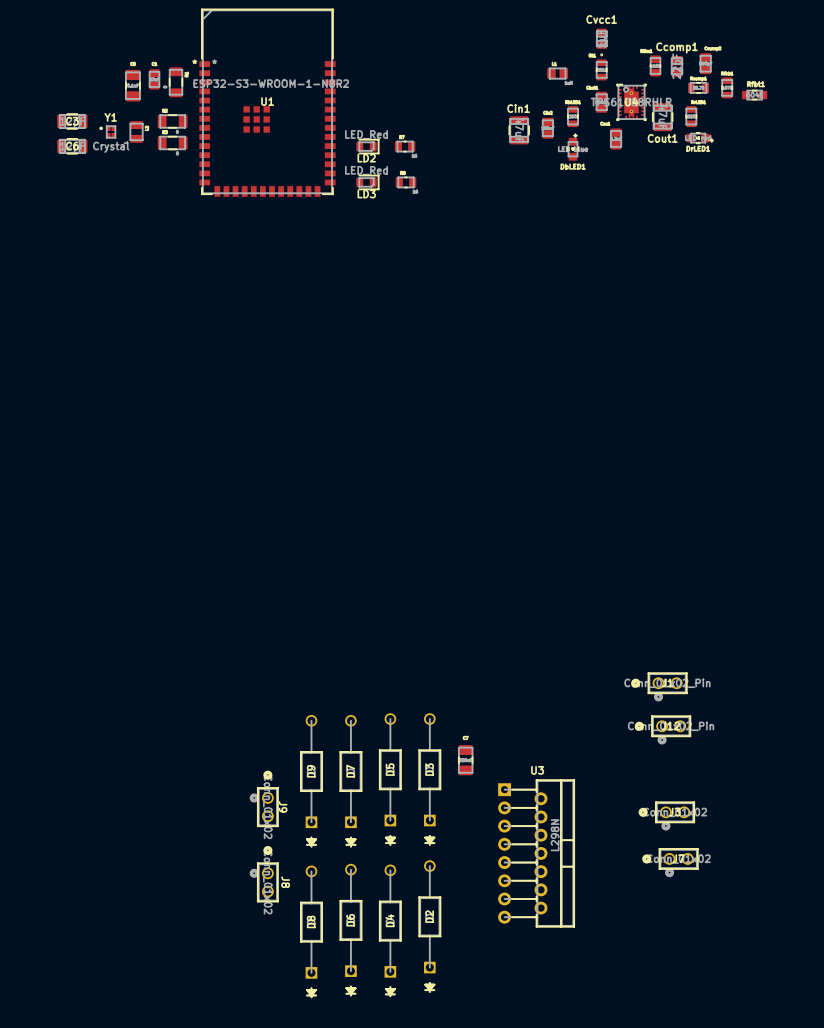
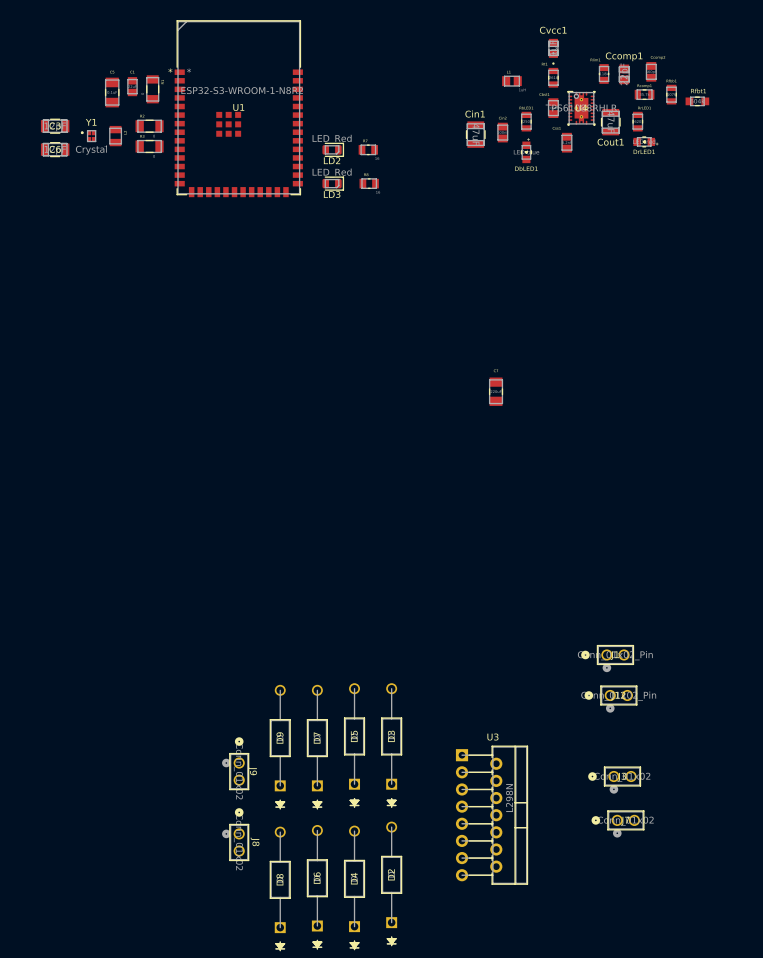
part position: (465, 760) -> (496, 391)

